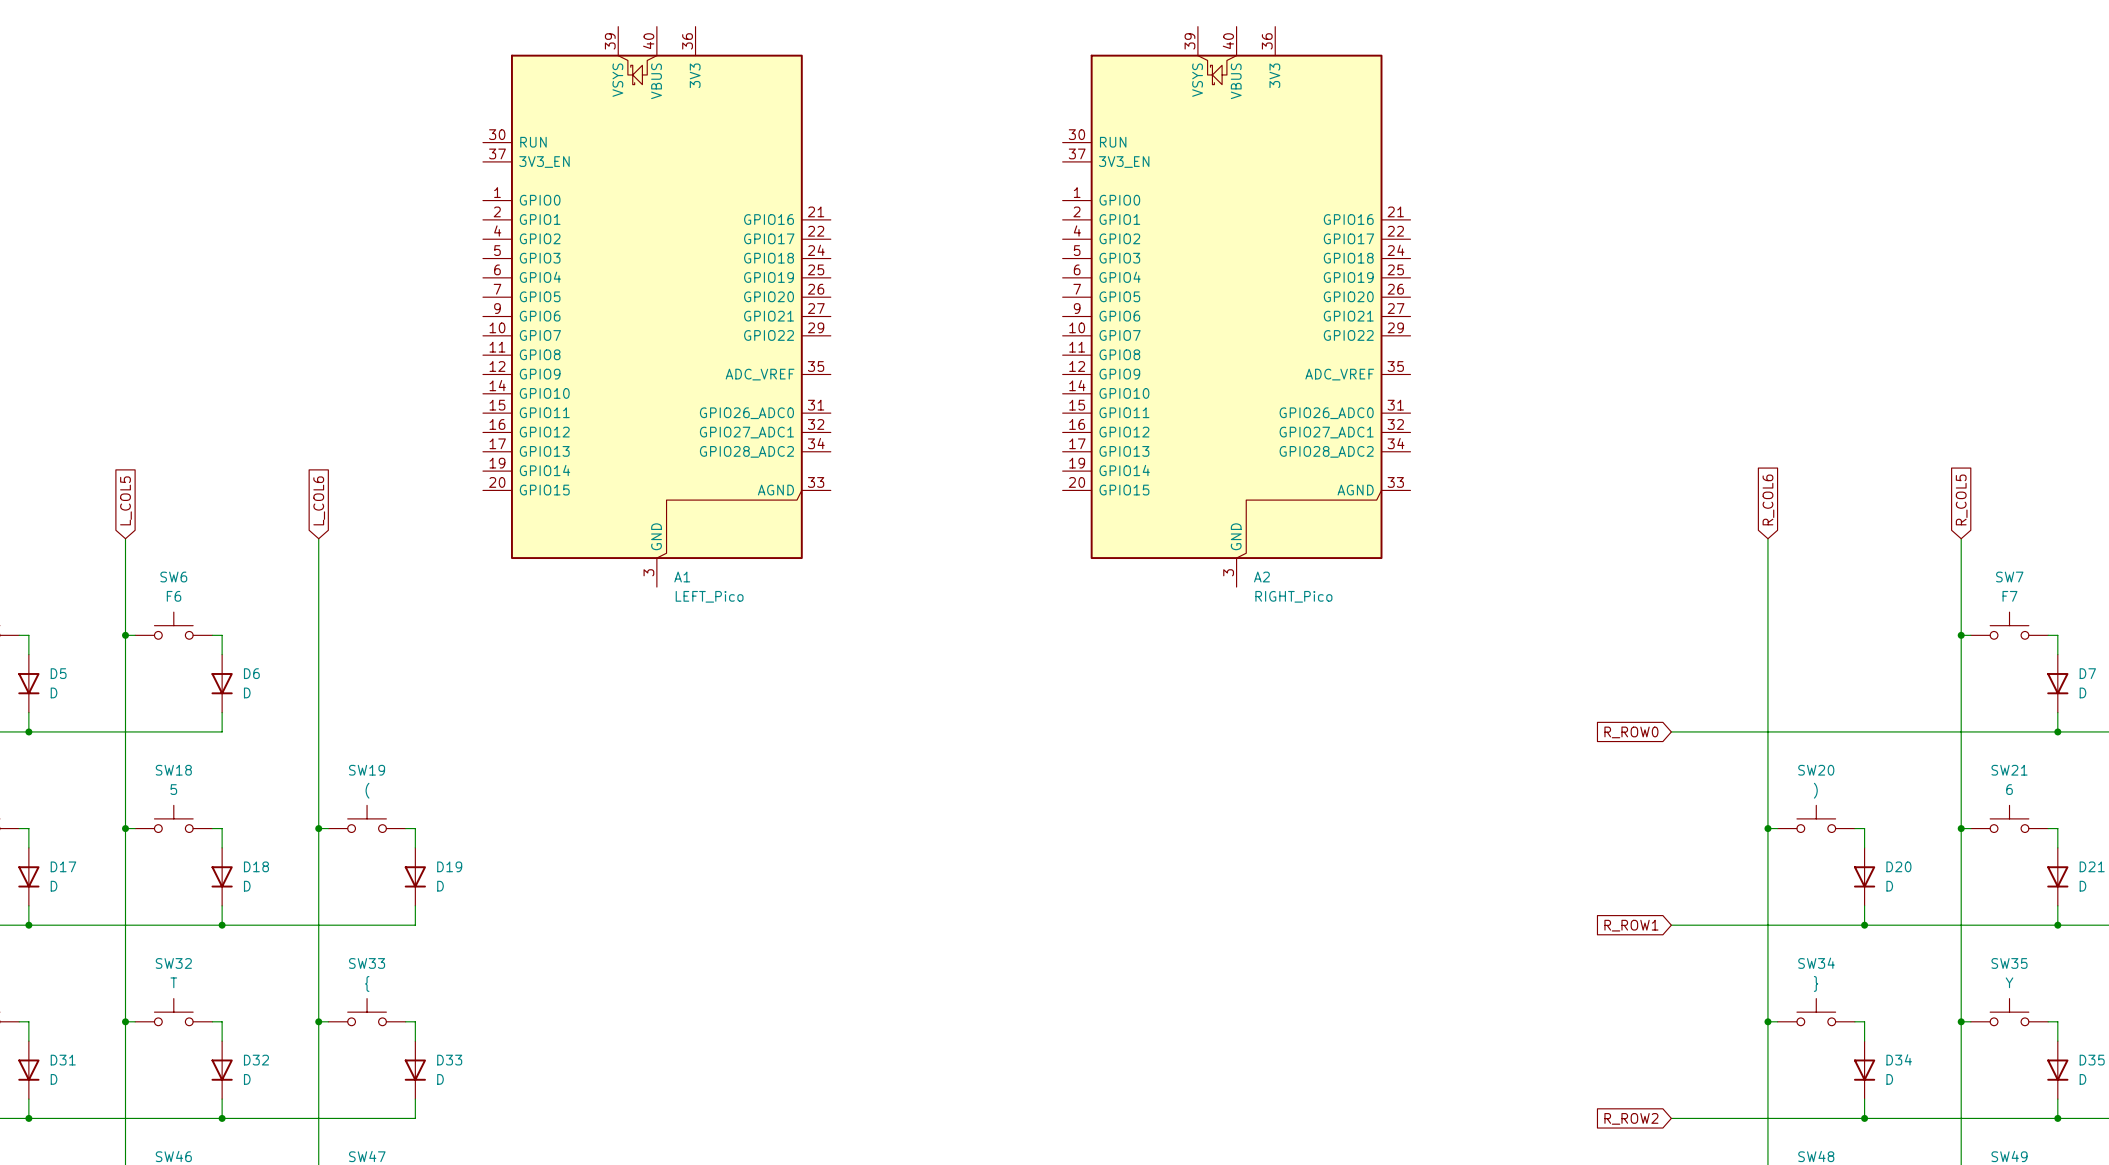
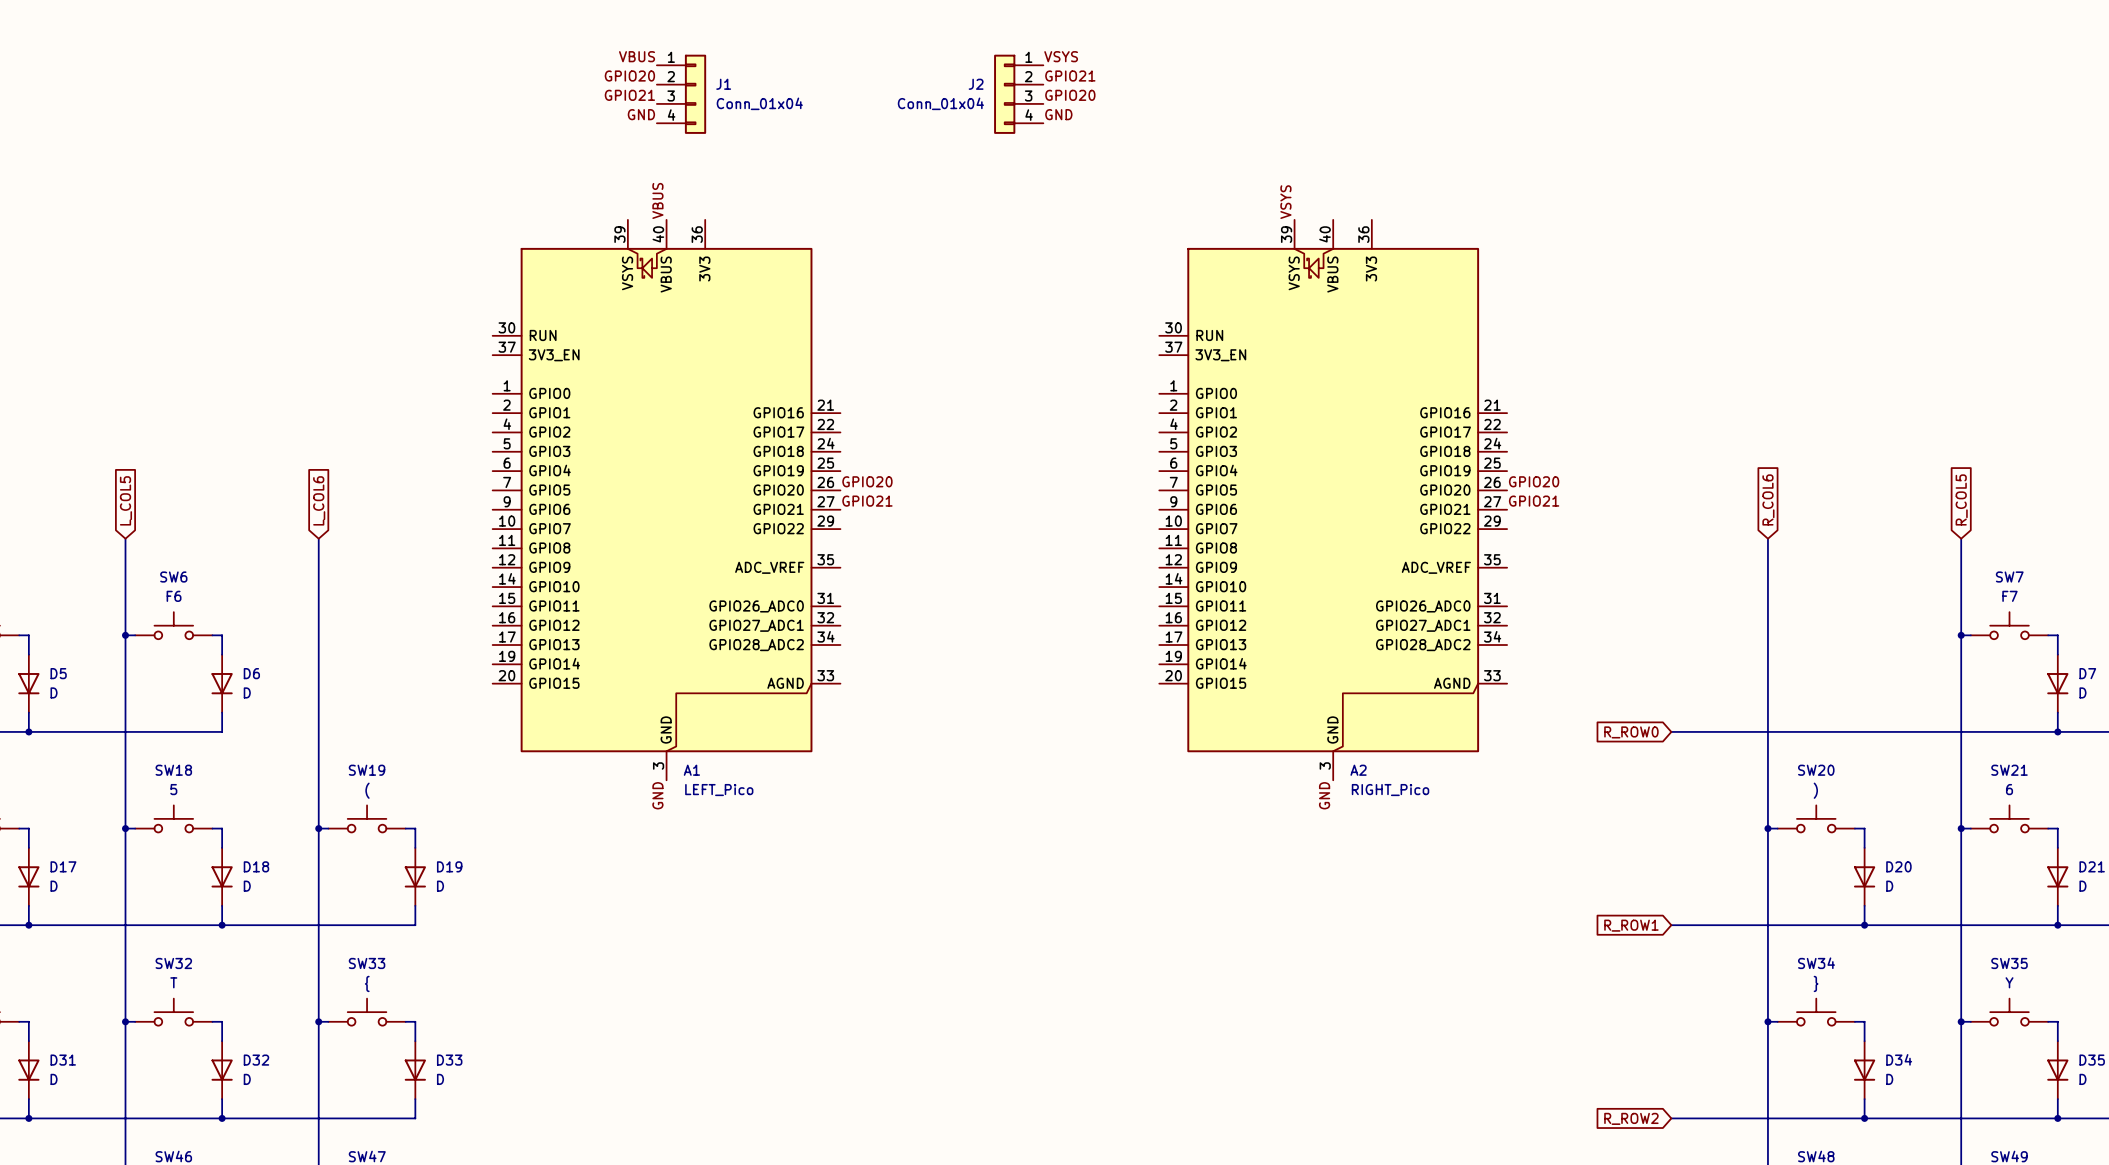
label: none -> VBUS (637, 56)
label: none -> VSYS (1061, 56)
label: none -> GPIO20 (629, 76)
label: none -> GPIO21 (1070, 76)
J1: none -> Conn_01x04 (681, 94)
J2: none -> Conn_01x04 (1018, 94)
label: none -> GPIO21 (629, 95)
label: none -> GPIO20 (1070, 95)
label: none -> GND (641, 114)
label: none -> GND (1058, 114)
label: none -> VBUS (657, 200)
label: none -> VSYS (1285, 202)
A1 position: (656, 306) -> (666, 500)
A2 position: (1236, 306) -> (1333, 500)
label: none -> GPIO20 (867, 481)
label: none -> GPIO20 (1534, 481)
label: none -> GPIO21 (867, 501)
label: none -> GPIO21 (1534, 501)
label: none -> GND (657, 795)
label: none -> GND (1324, 795)

